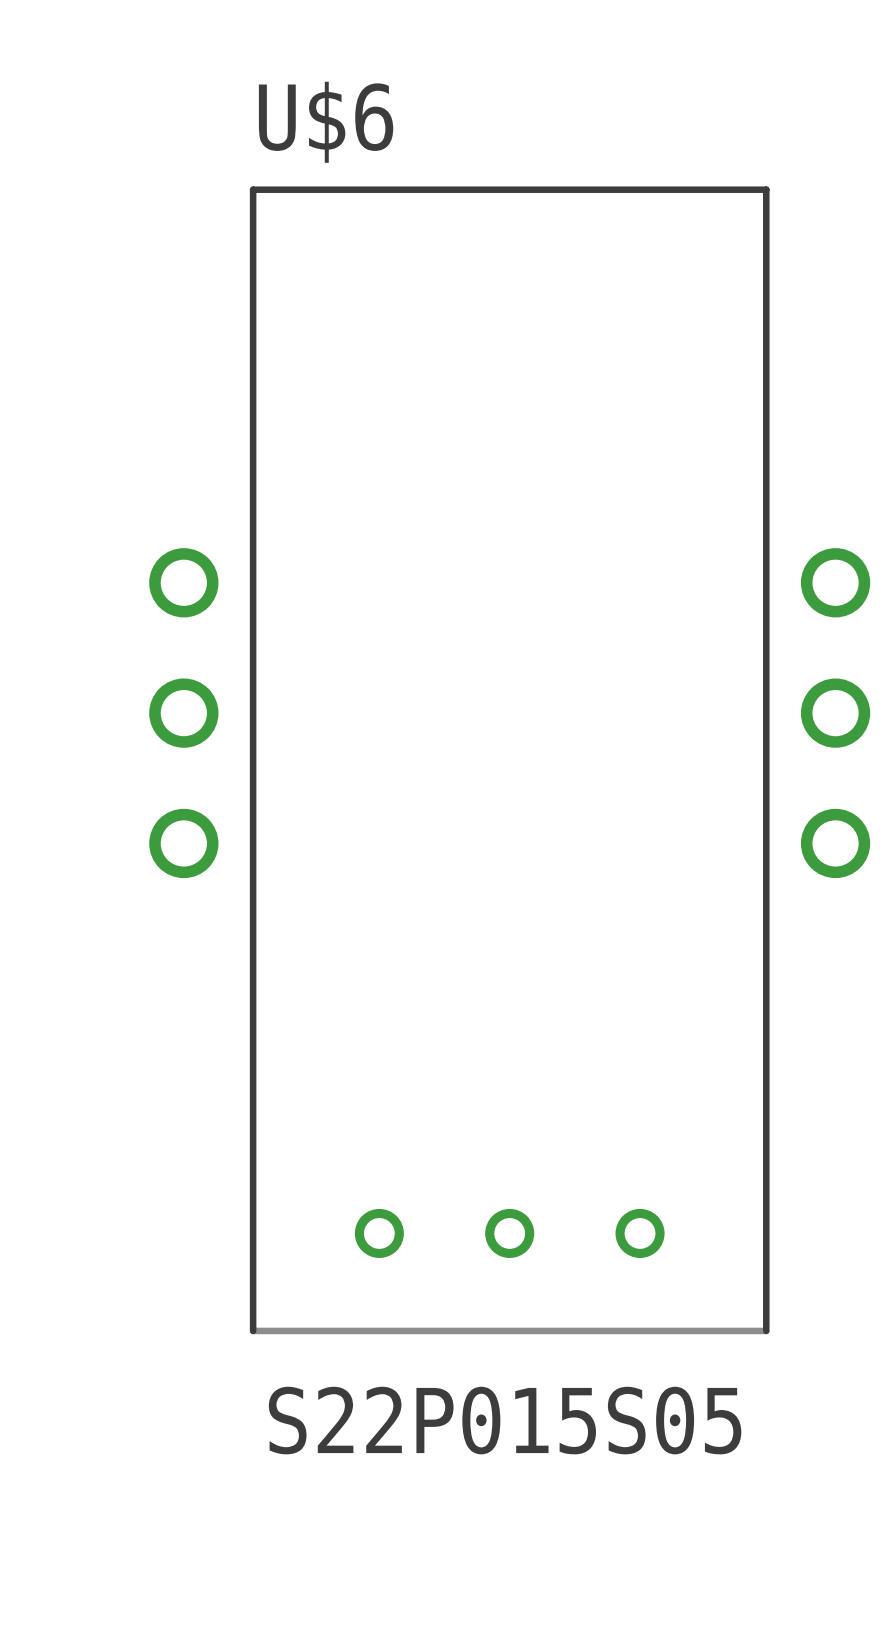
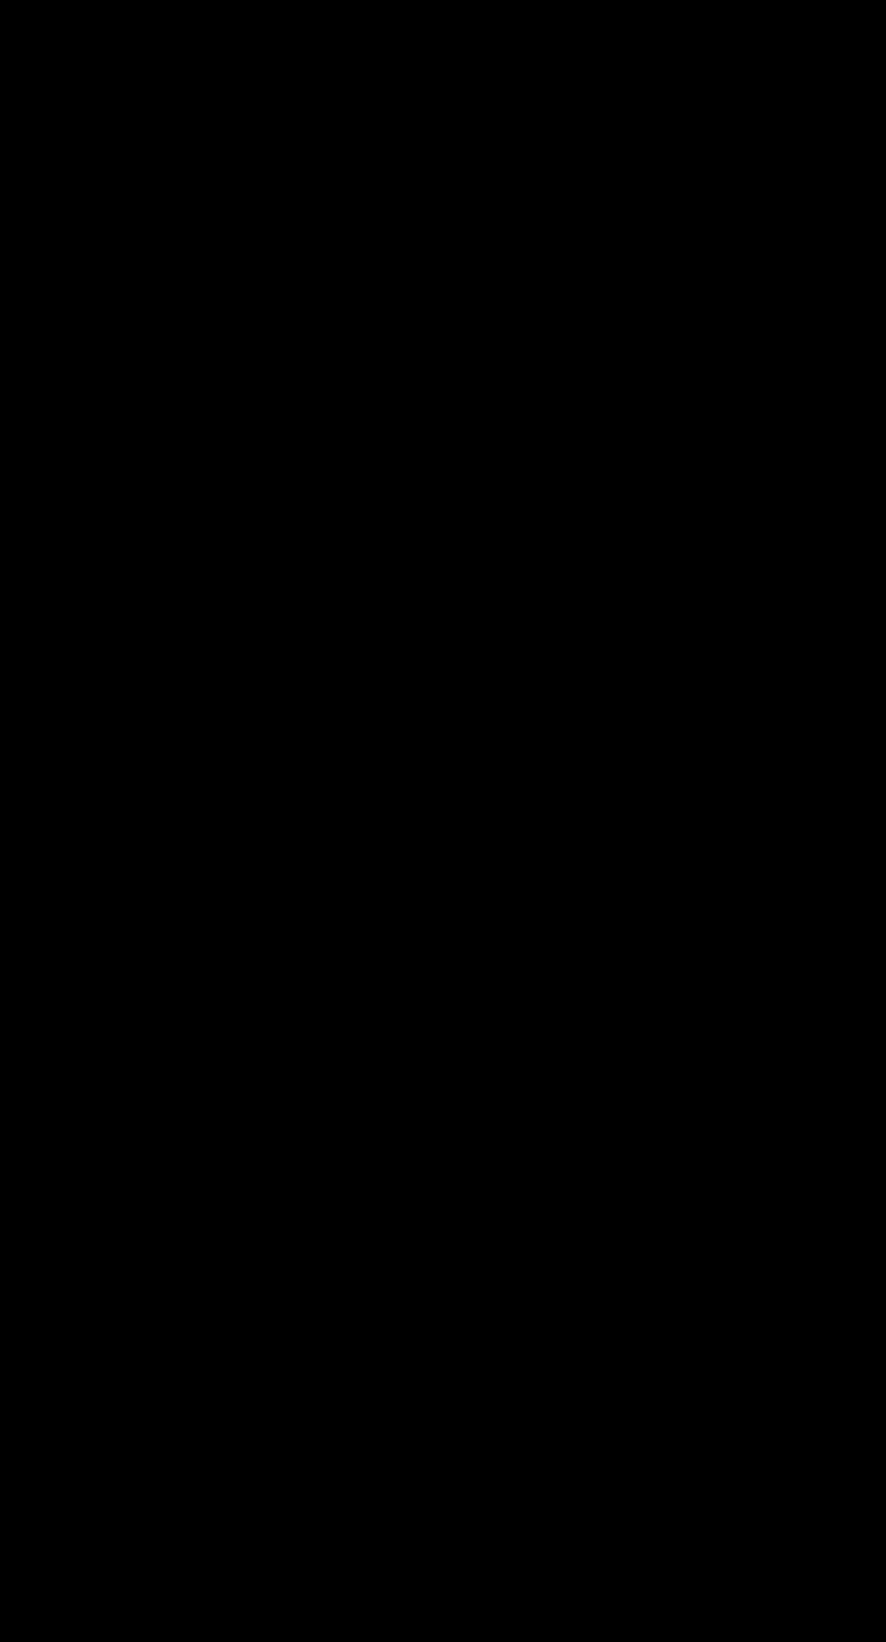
U$6: S22P015S05 (509, 760) -> none

